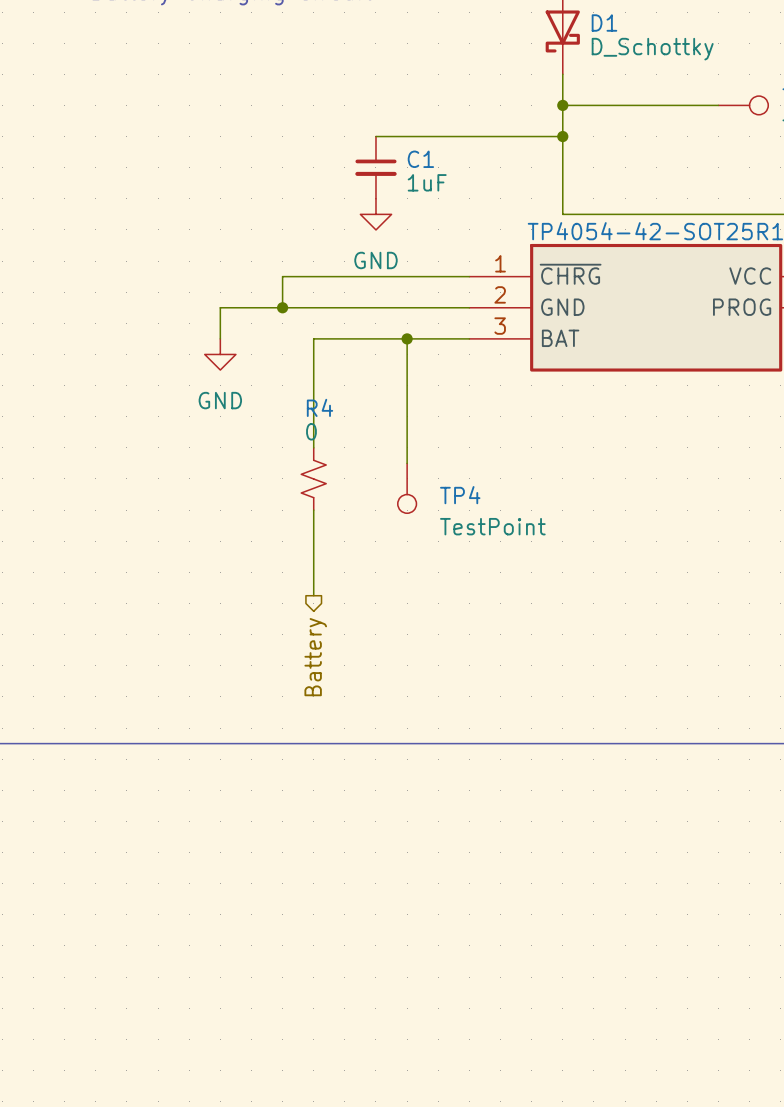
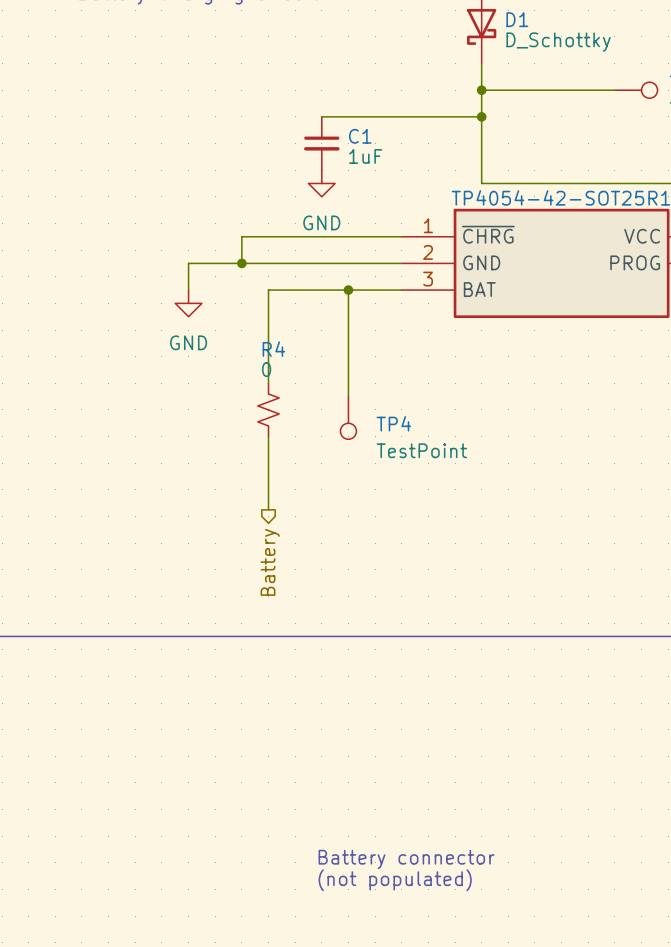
text: none -> Battery connector (406, 859)
text: none -> (not populated) (395, 880)

